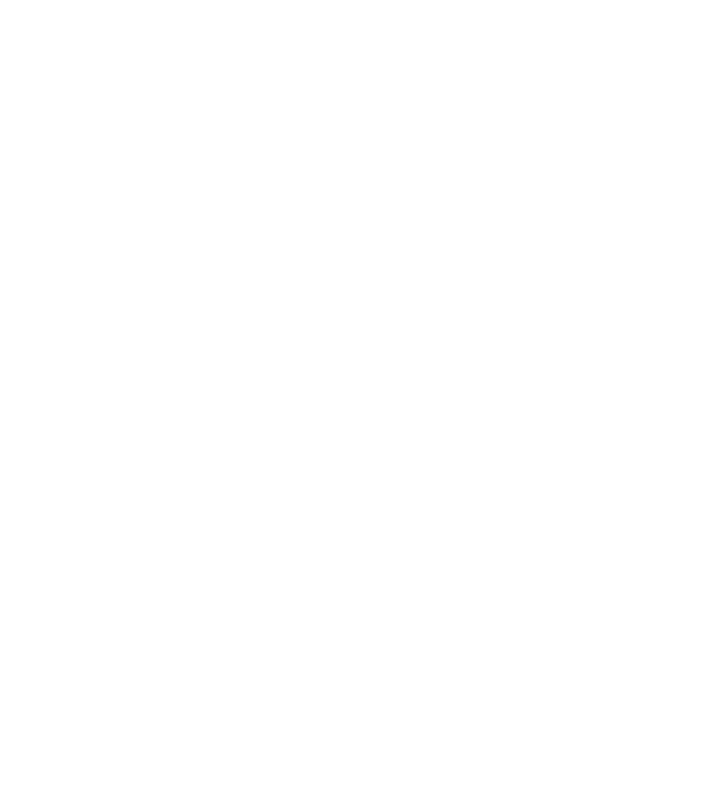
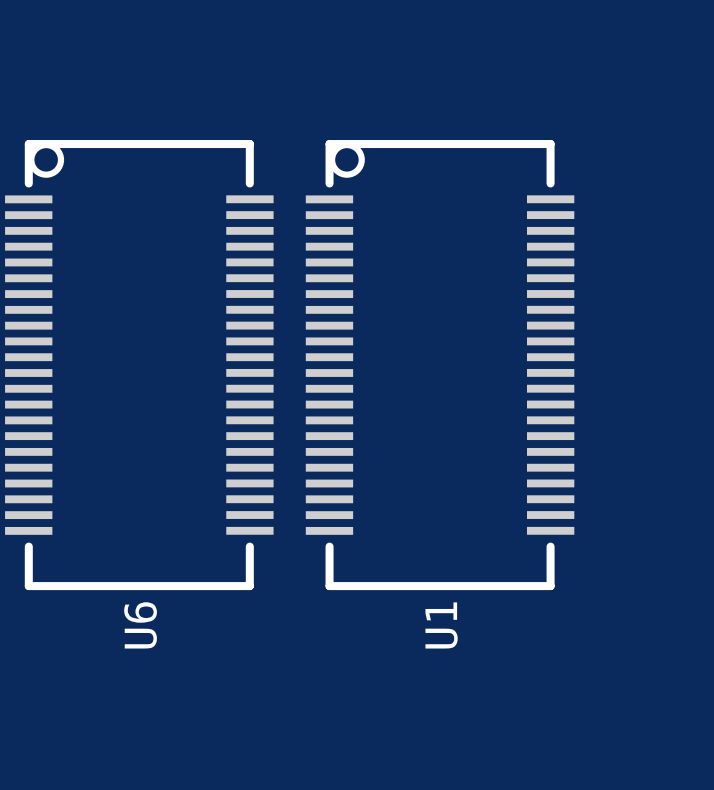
U6: none -> (139, 365)
U1: none -> (440, 365)

